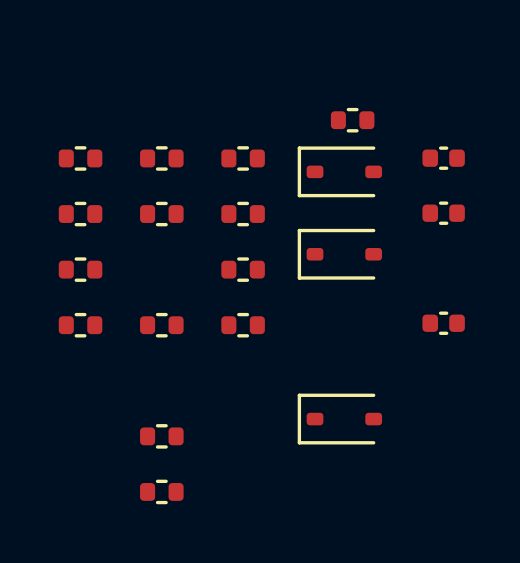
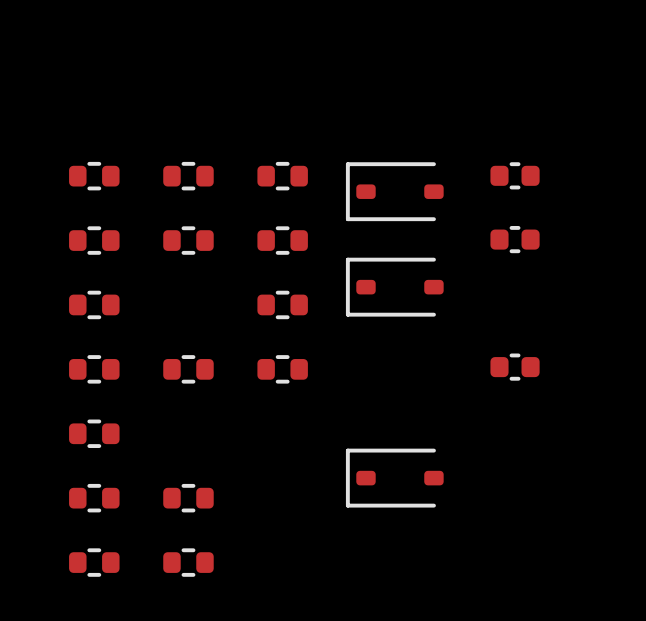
part: (352, 120) -> none
part: none -> (94, 433)
part: none -> (94, 498)
part: none -> (94, 562)

